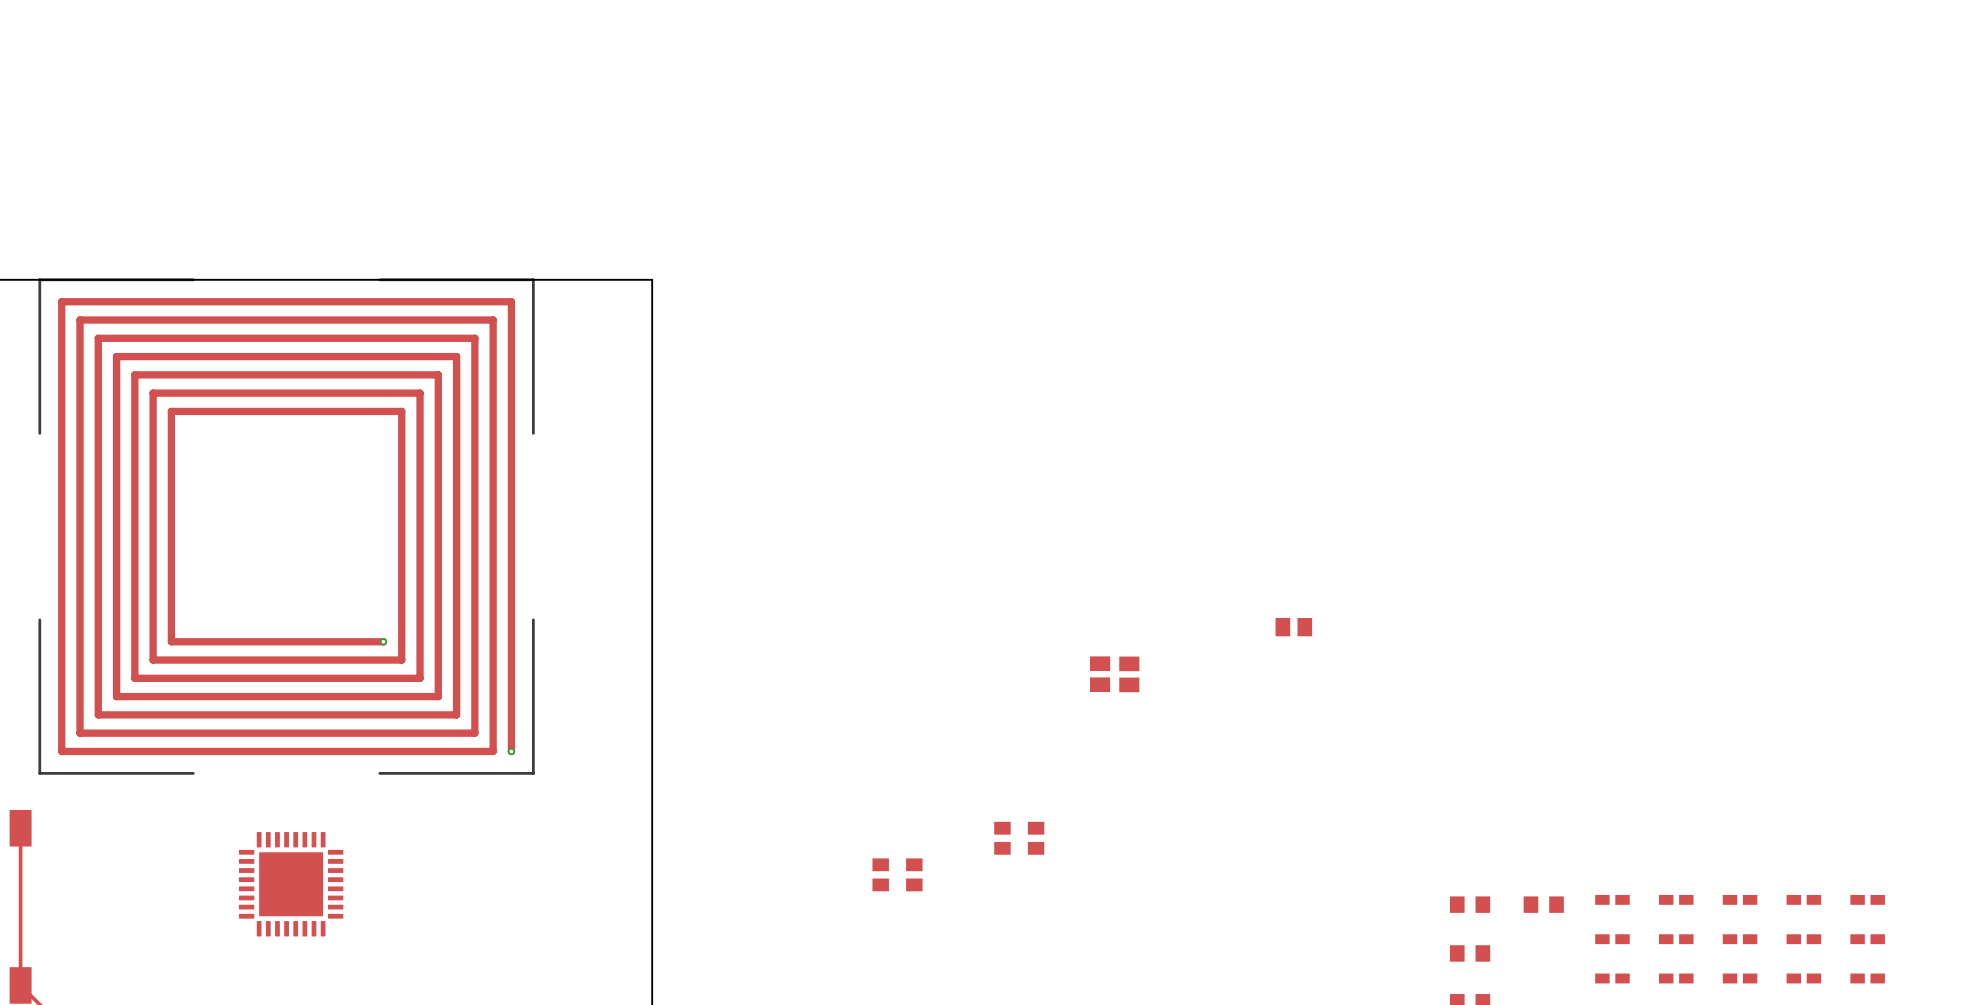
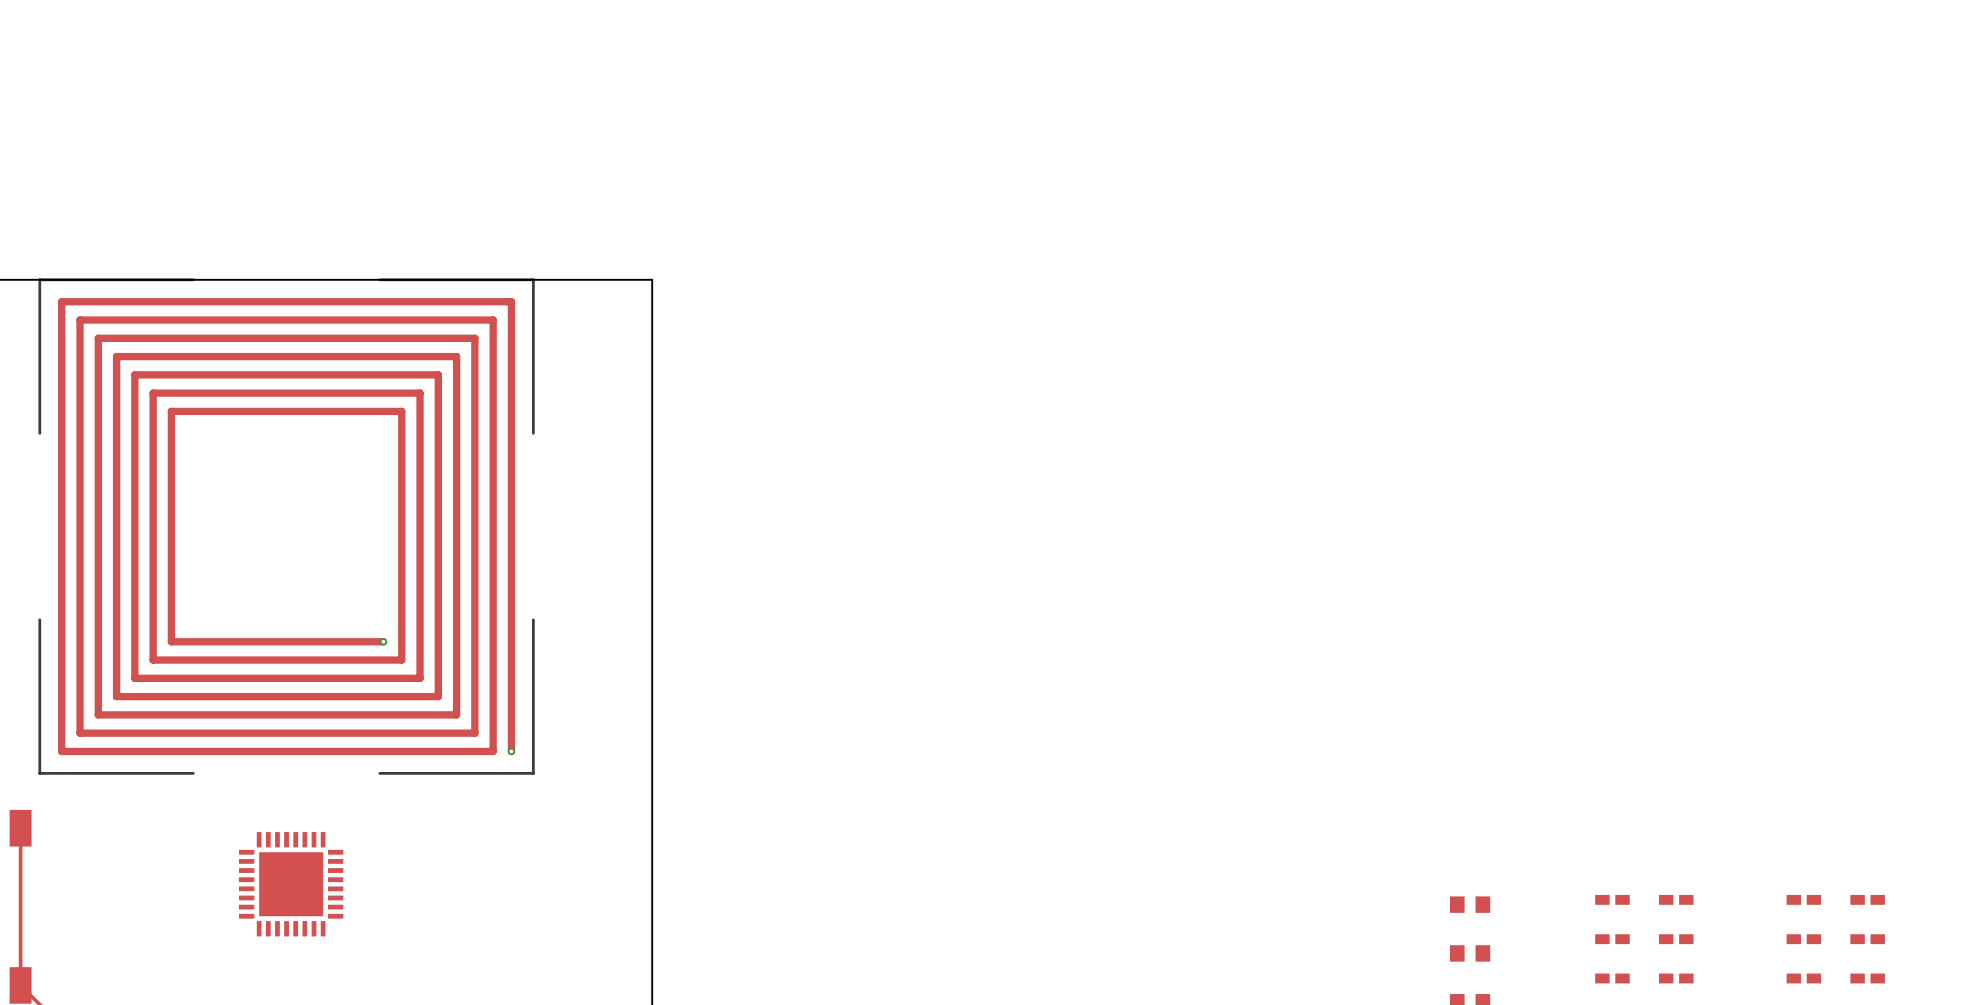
part: (1293, 627) -> none
part: (1114, 674) -> none
part: (1019, 838) -> none
part: (897, 874) -> none
part: (1740, 899) -> none
part: (1543, 904) -> none
part: (1740, 939) -> none
part: (1740, 978) -> none

